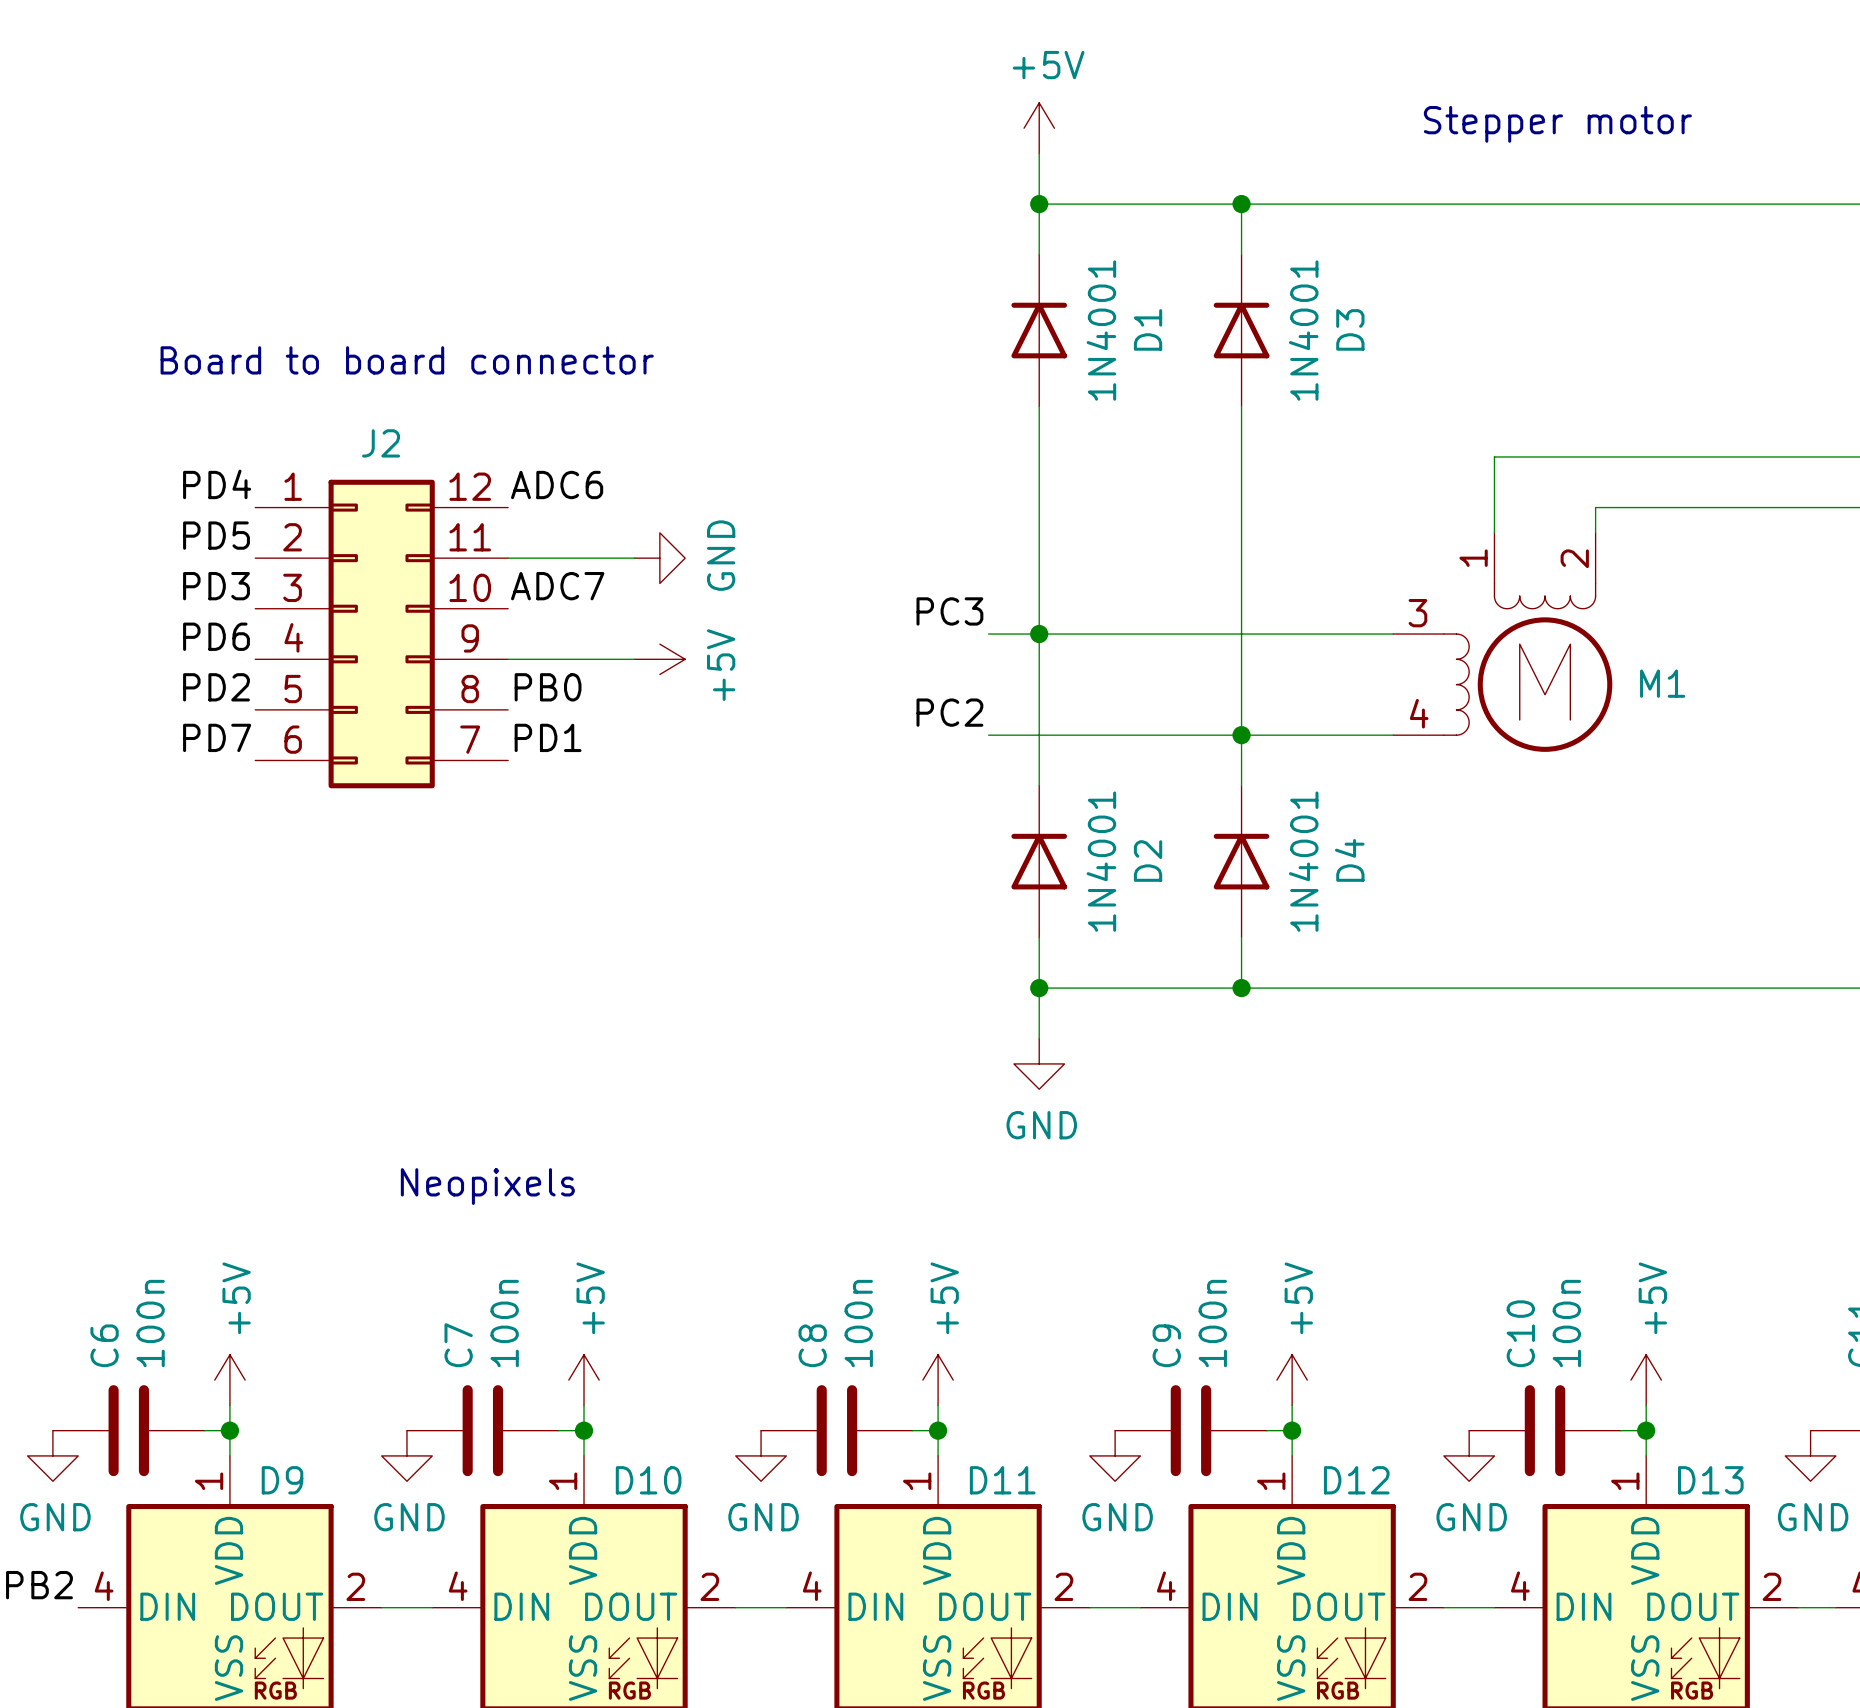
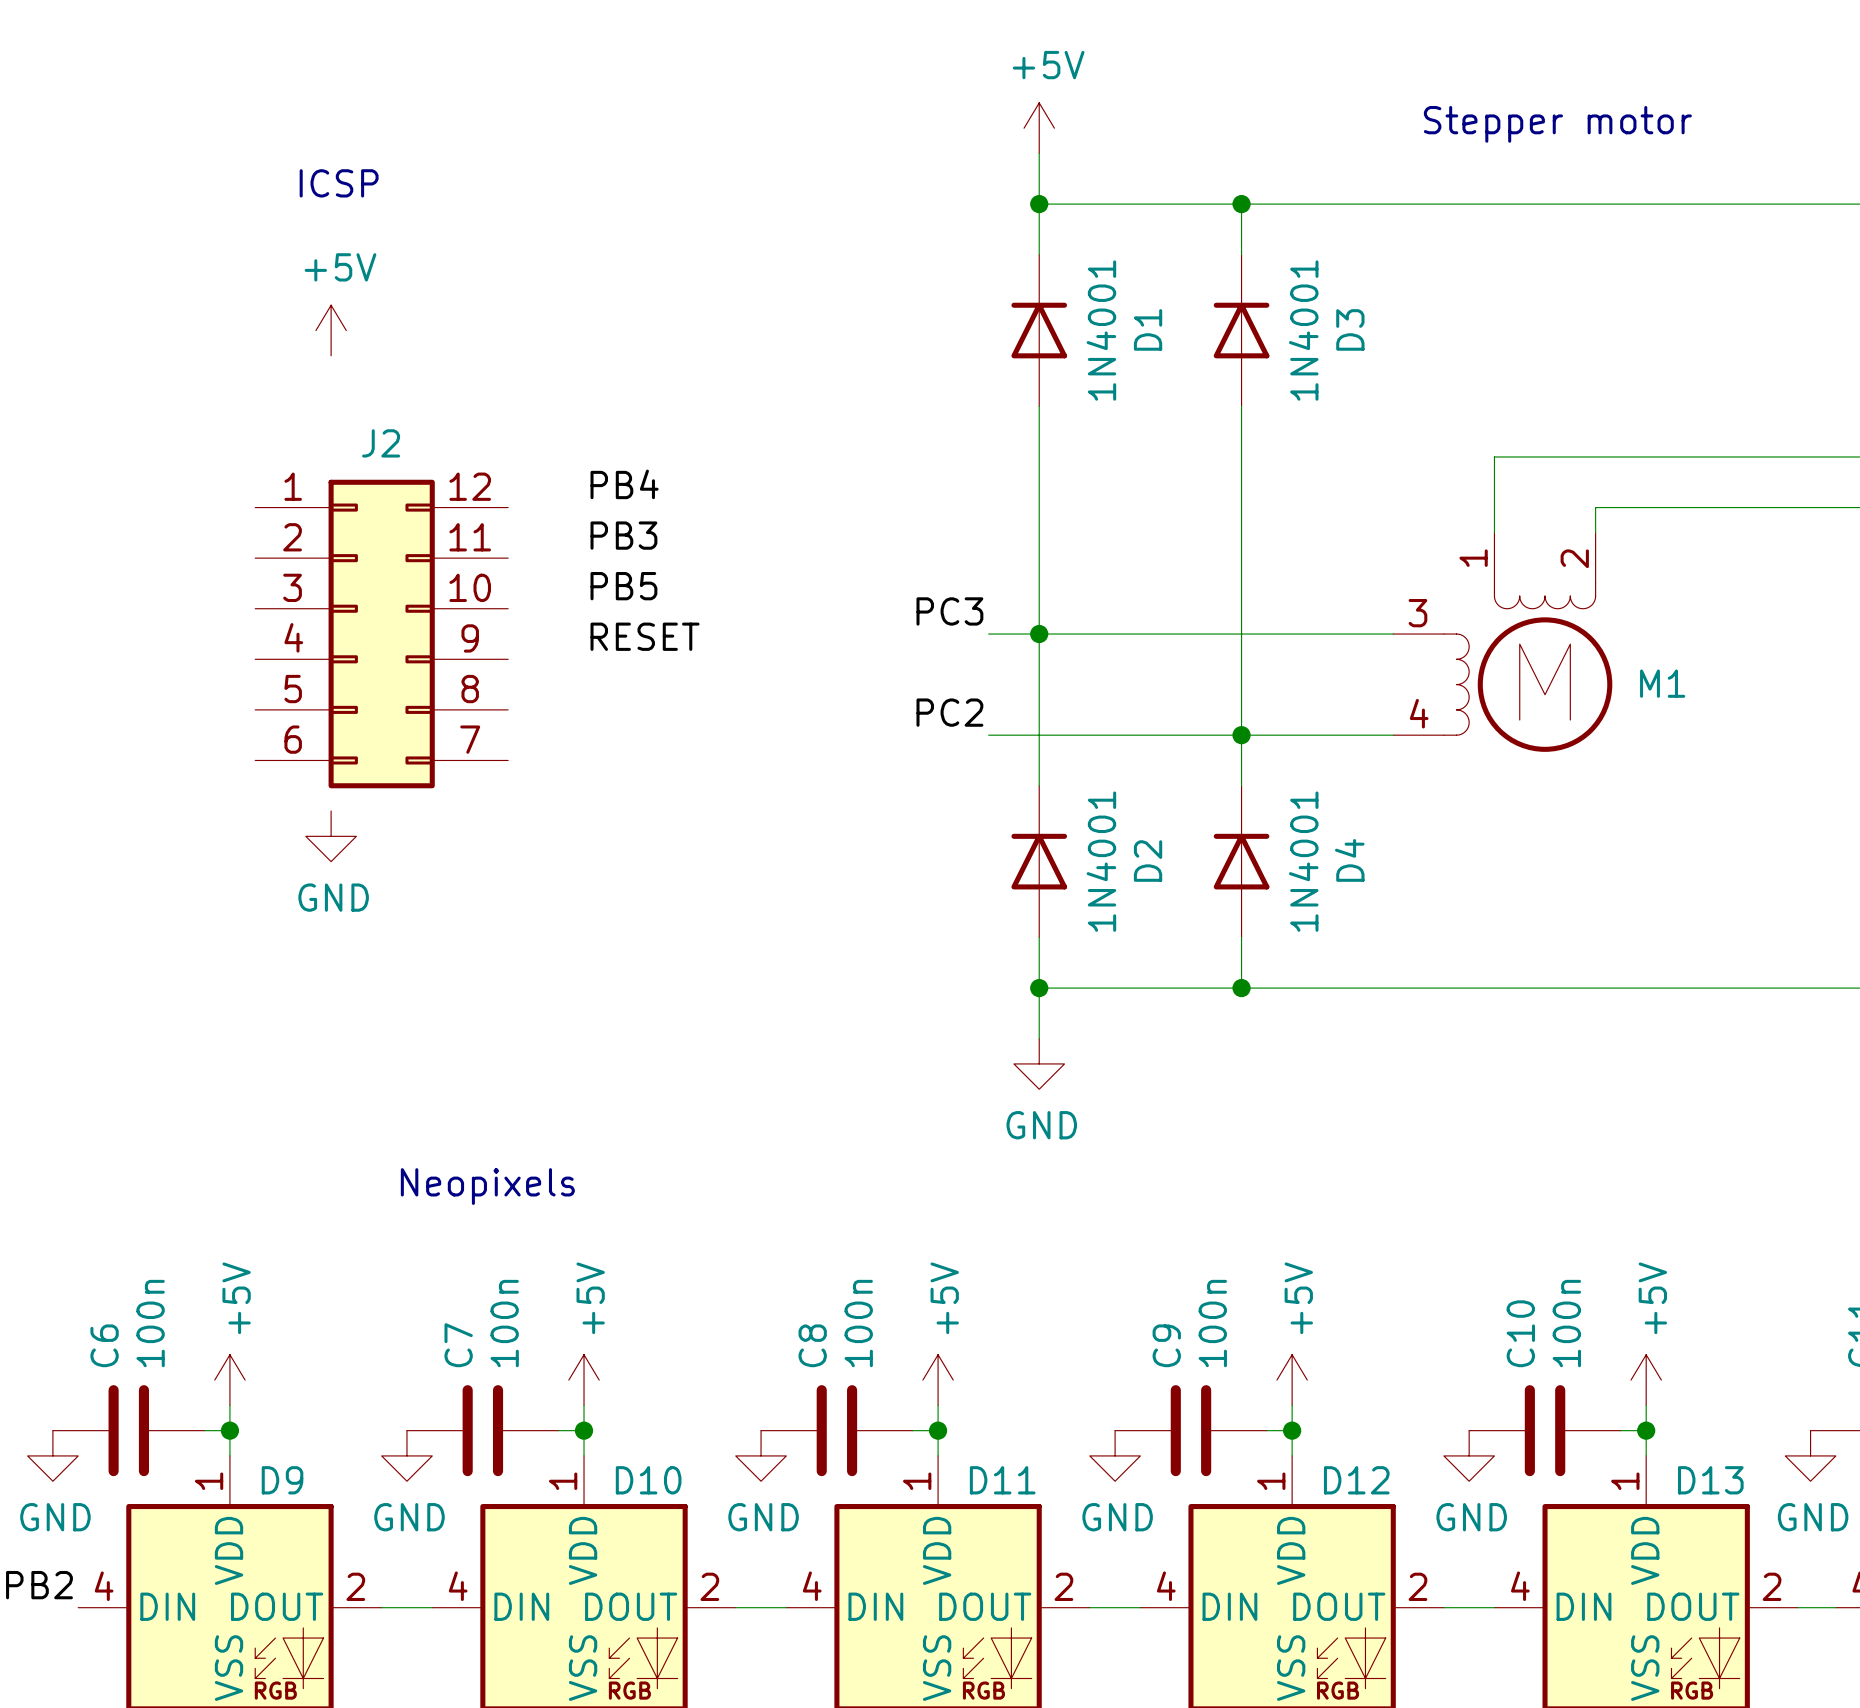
text: none -> ICSP (339, 183)
power symbol: none -> +5V (331, 330)
text: Board to board connector (407, 360) -> none
label: PD4 (217, 484) -> none
label: none -> PB4 (624, 484)
label: ADC6 (557, 485) -> none
label: PD5 (216, 535) -> none
label: none -> PB3 (623, 535)
wire: (508, 558) (634, 558) -> none
power symbol: GND (659, 558) -> none
label: PD3 (216, 586) -> none
label: ADC7 (557, 586) -> none
label: none -> PB5 (623, 586)
label: PD6 (216, 636) -> none
label: none -> RESET (645, 636)
wire: (508, 659) (634, 659) -> none
power symbol: +5V (659, 659) -> none
label: PD2 (216, 687) -> none
label: PB0 (548, 687) -> none
label: PD7 (217, 737) -> none
label: PD1 (548, 737) -> none
power symbol: none -> GND (331, 836)

